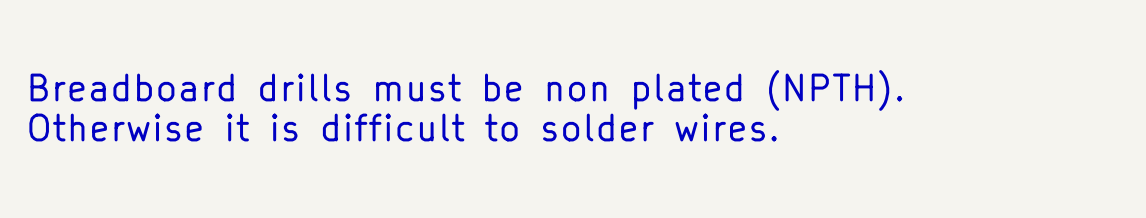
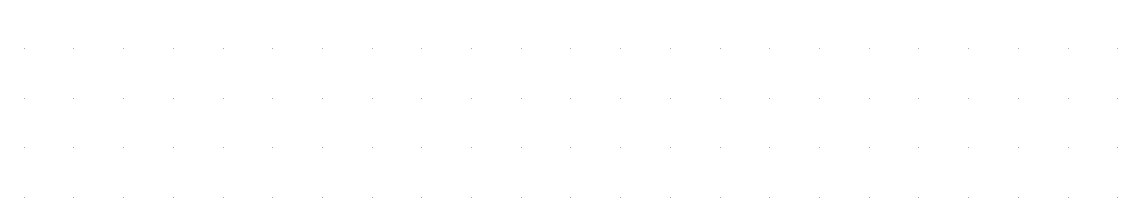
text: Breadboard drills must be non plated (NPTH). (466, 90) -> none
text: Otherwise it is difficult to solder wires. (403, 127) -> none

